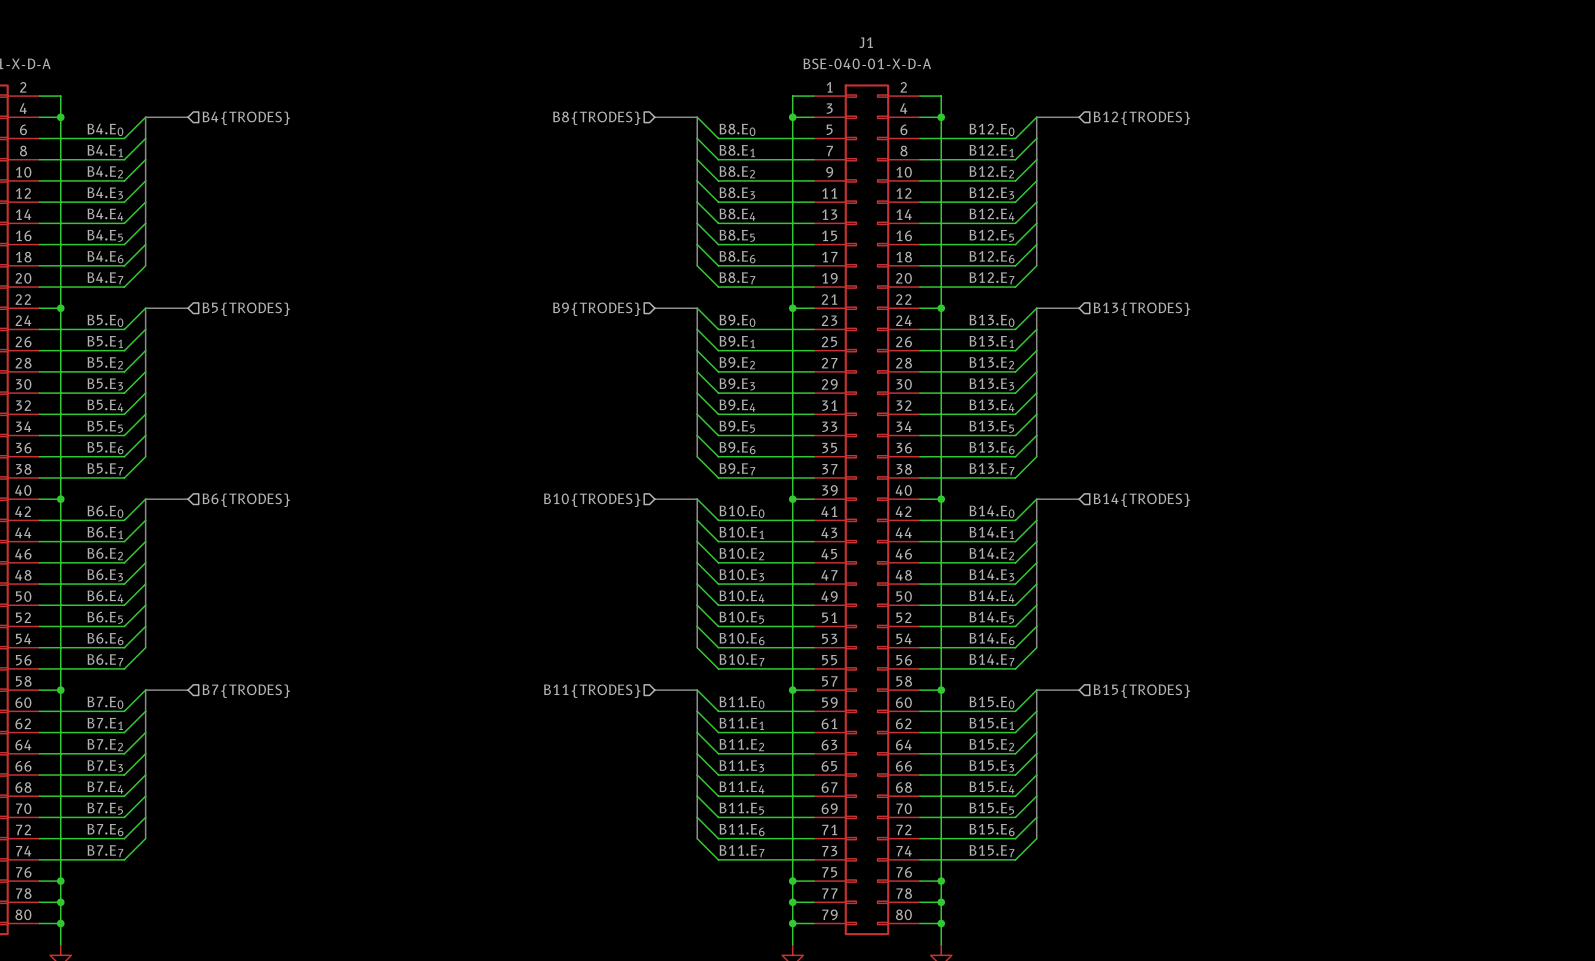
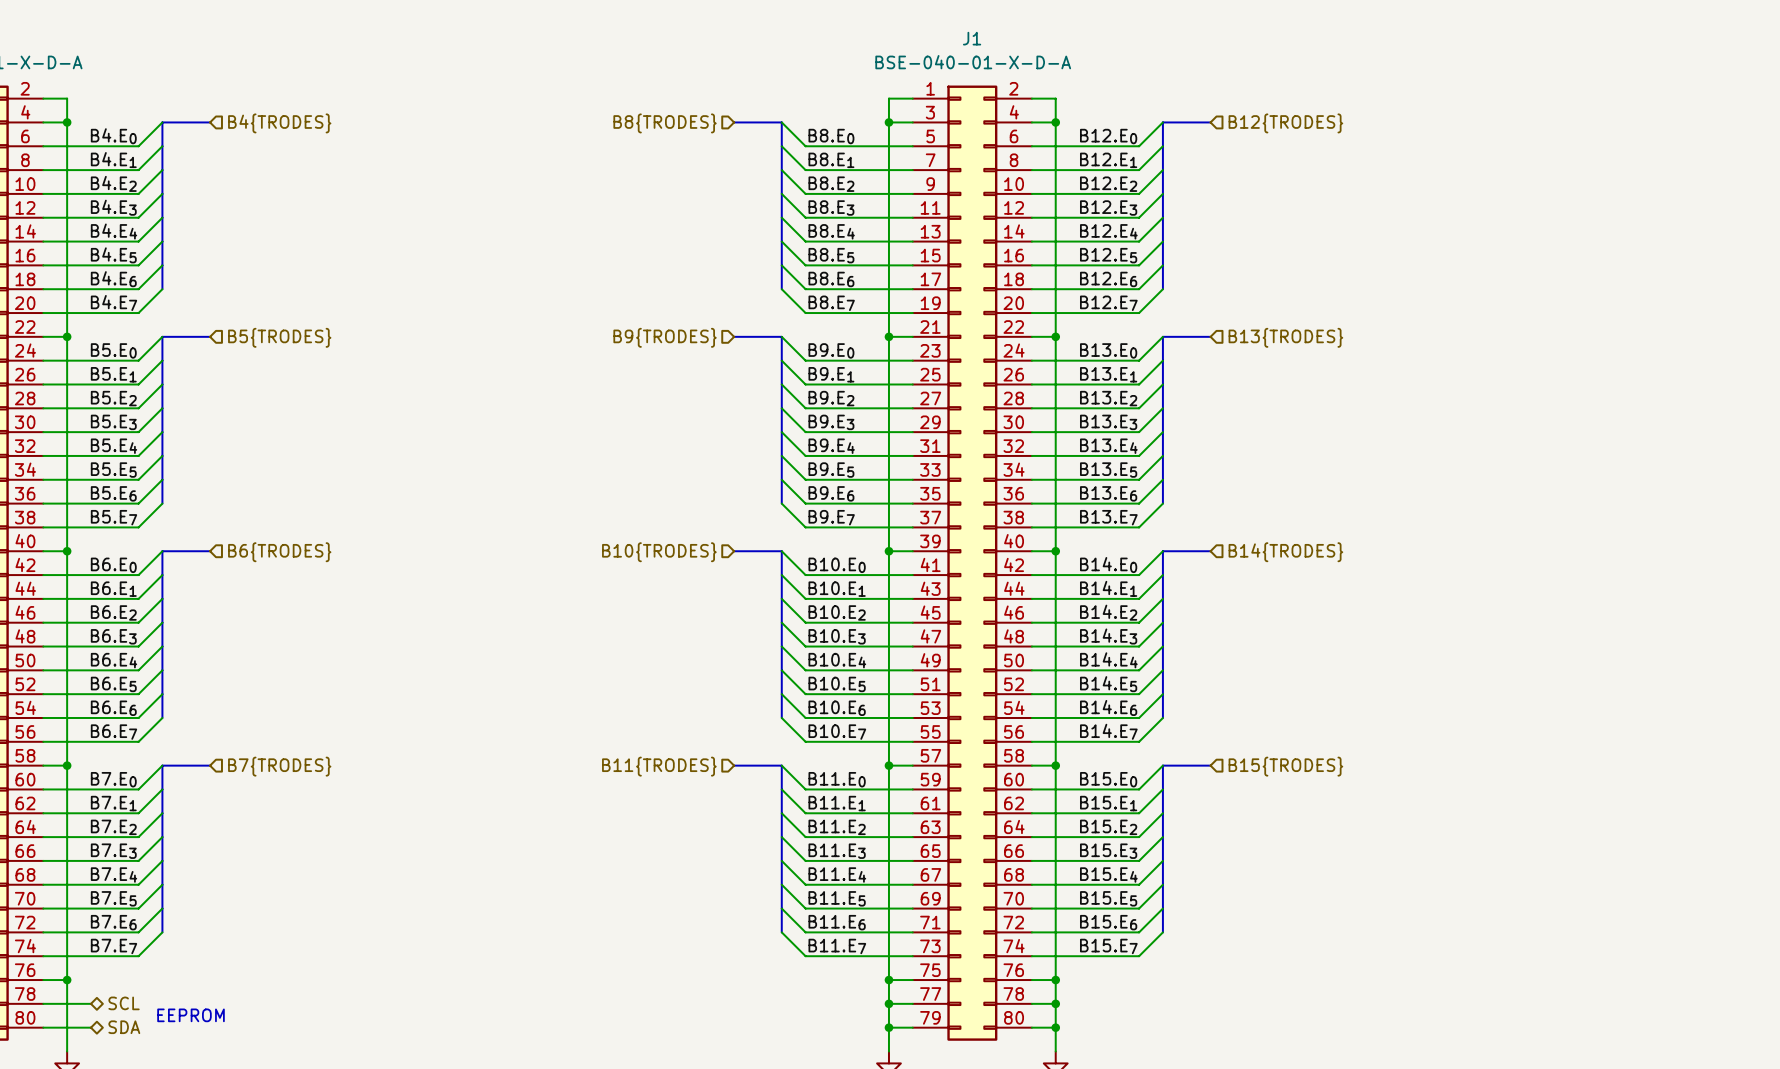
hierarchical label: none -> SCL (124, 1003)
wire: none -> (67, 1003) (90, 1003)
junction: (60, 902) -> none
text: none -> EEPROM (191, 1015)
wire: none -> (67, 1027) (90, 1027)
junction: (60, 923) -> none
hierarchical label: none -> SDA (124, 1027)

